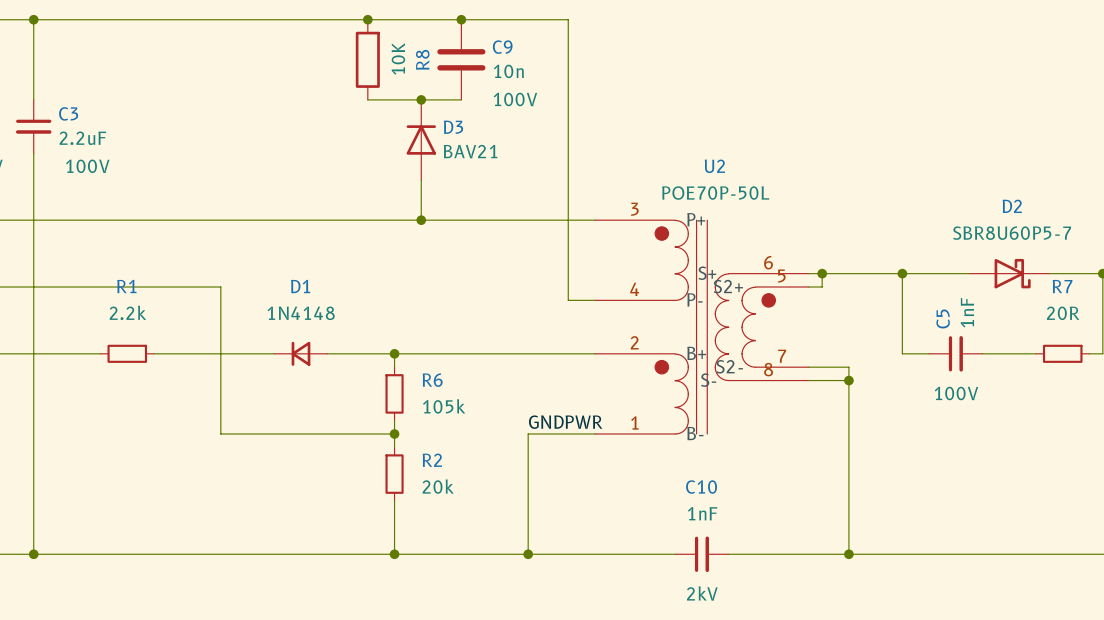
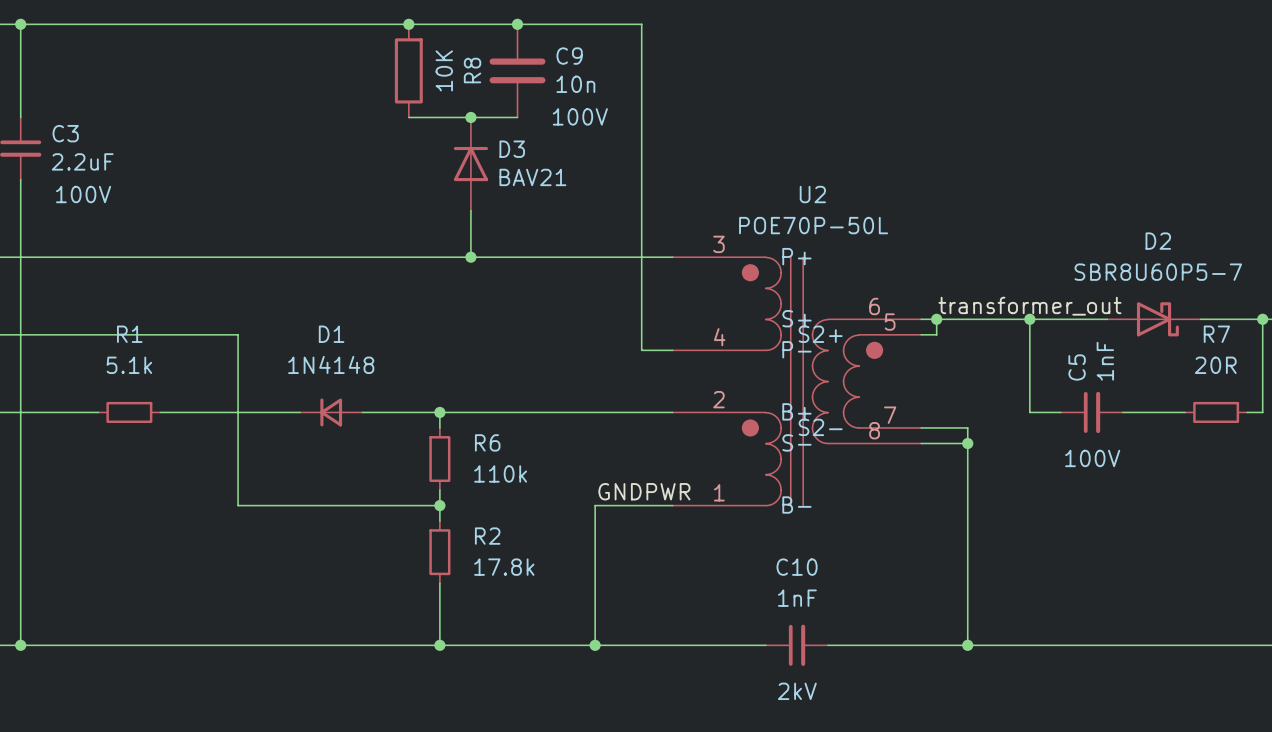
label: none -> transformer_out (1029, 306)
R1 value: 2.2k (127, 312) -> 5.1k (129, 365)
R6 value: 105k (444, 406) -> 110k (500, 473)
R2 value: 20k (438, 486) -> 17.8k (504, 567)

